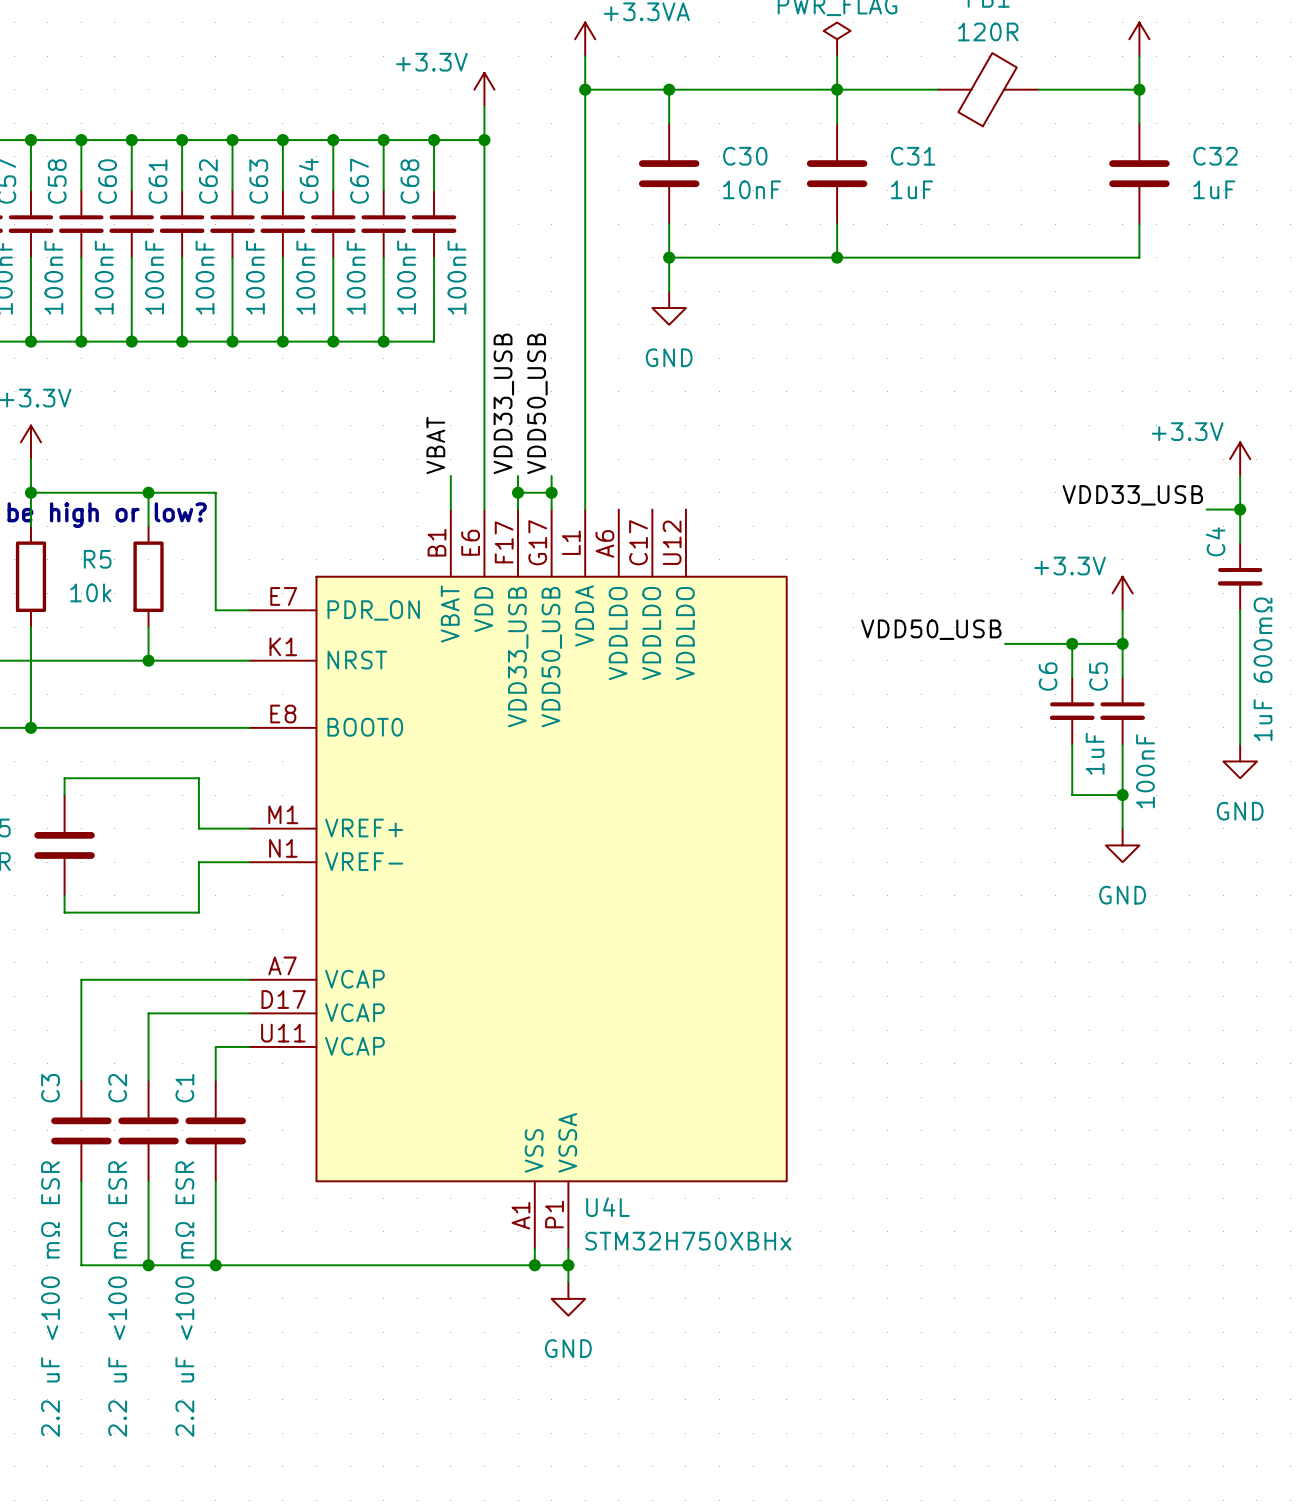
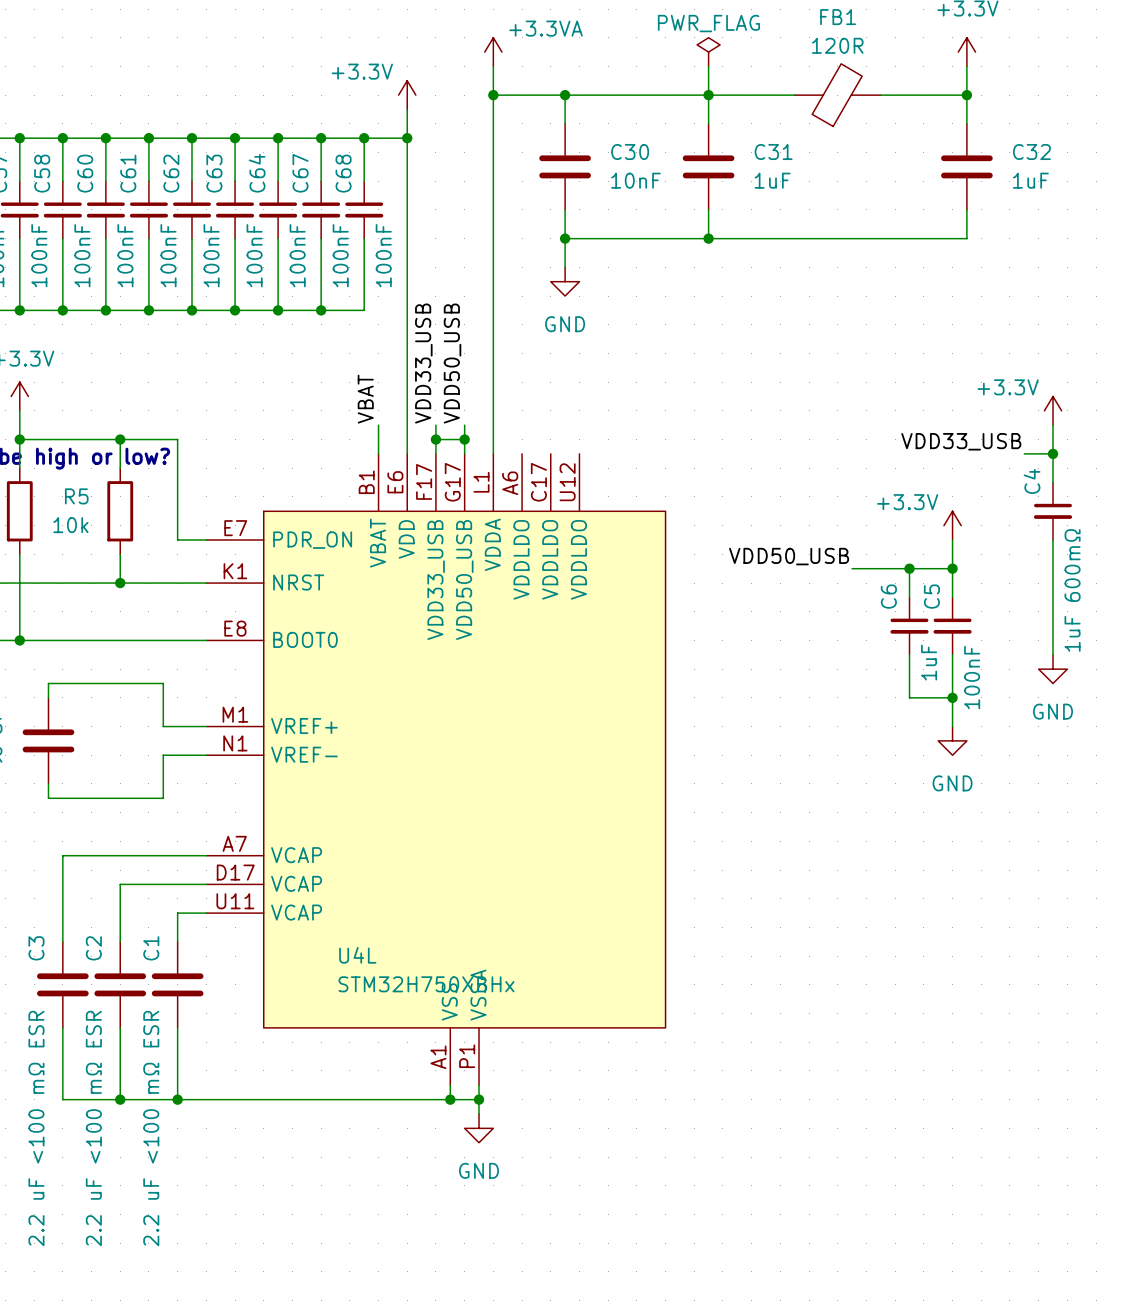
U4L name position: U4L (607, 1207) -> U4L (357, 955)
U4L value position: STM32H750XBHx (688, 1241) -> STM32H750XBHx (426, 984)

